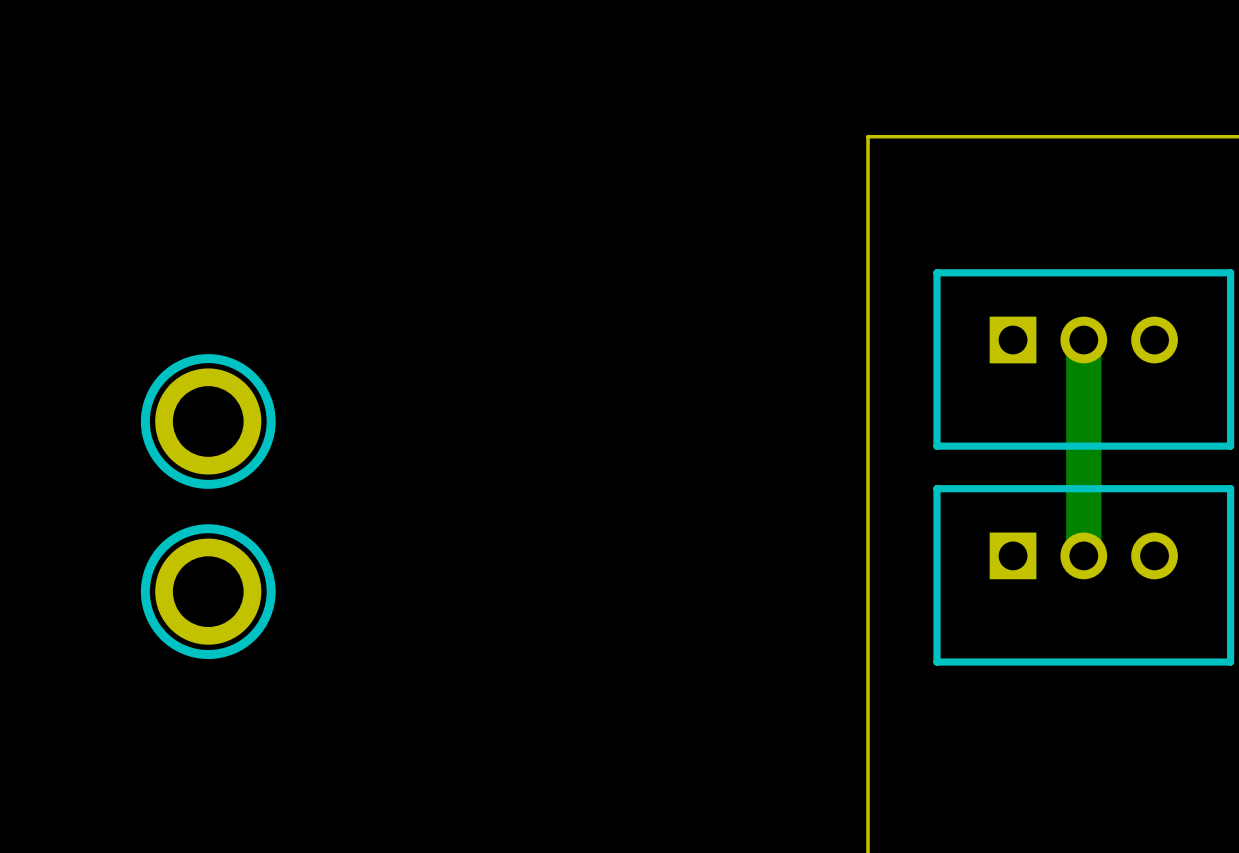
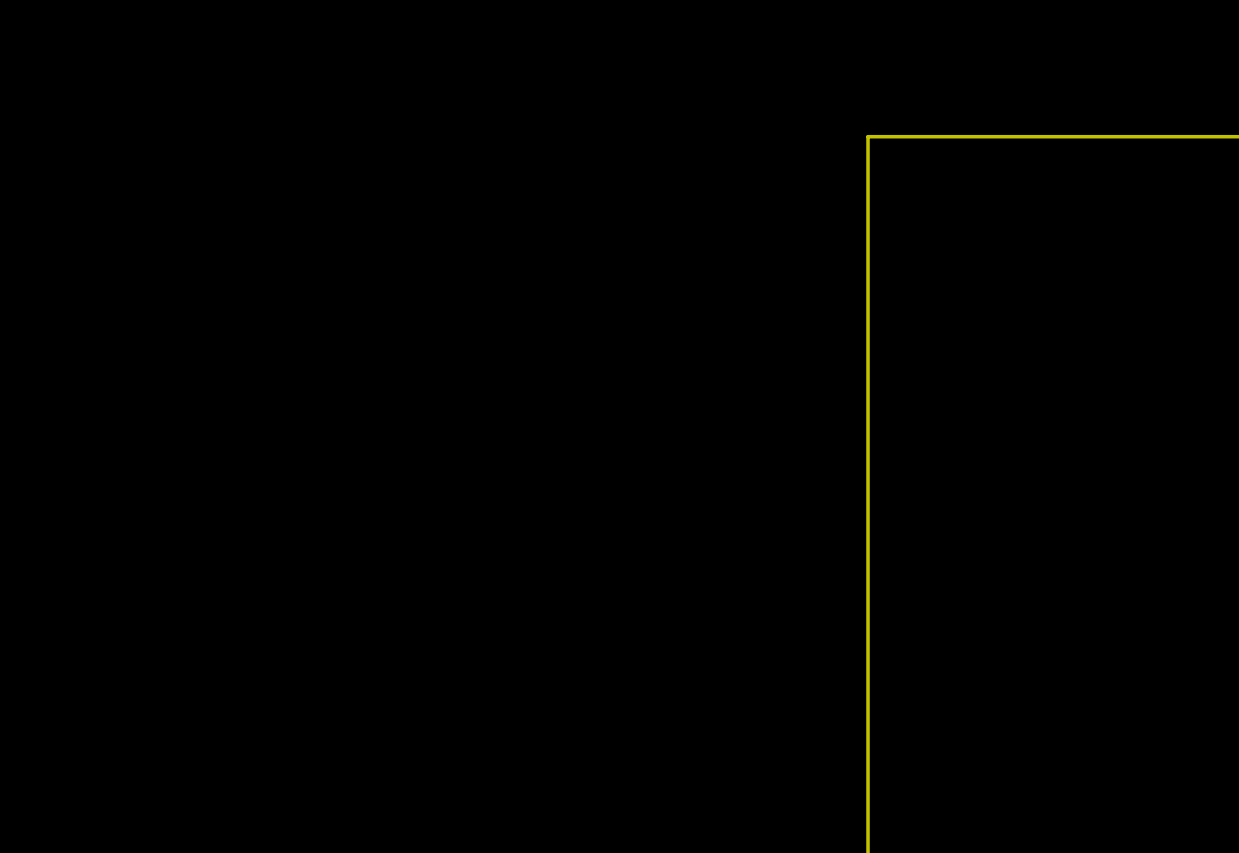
bottom track: (1083, 340) (1083, 555) -> none
part: (1083, 359) -> none
part: (208, 421) -> none
part: (1083, 575) -> none
part: (208, 591) -> none

